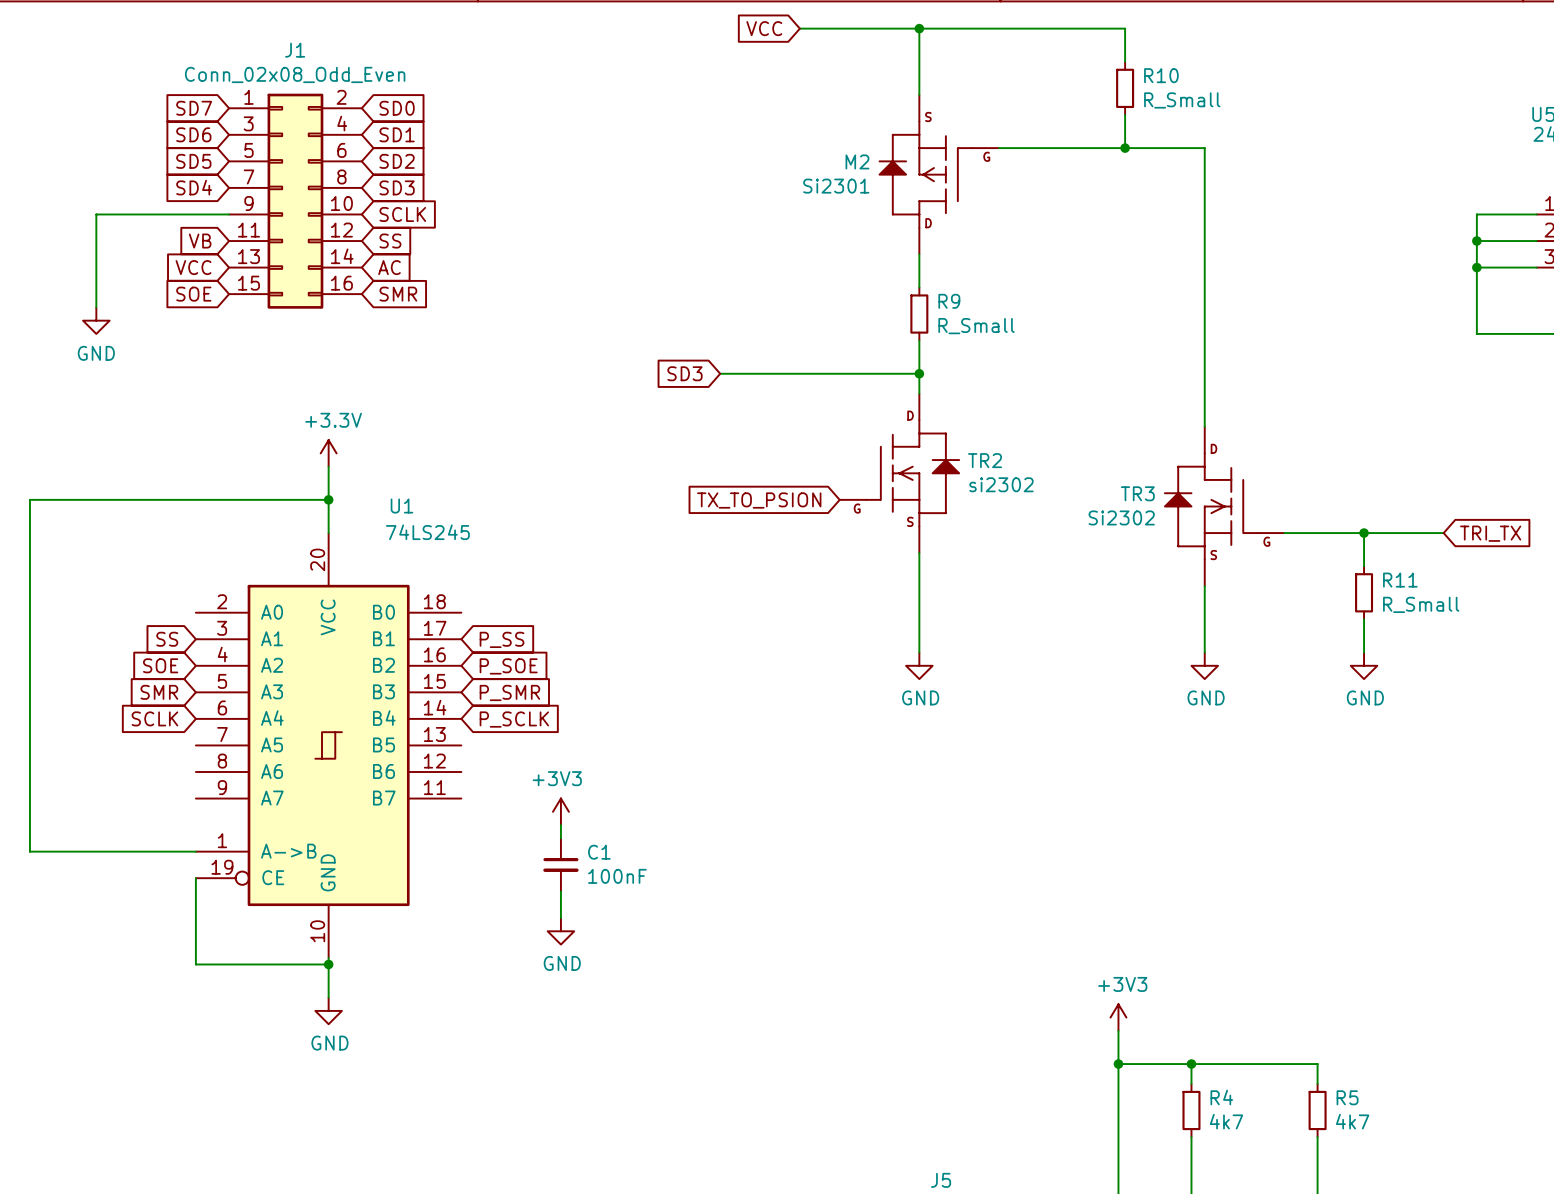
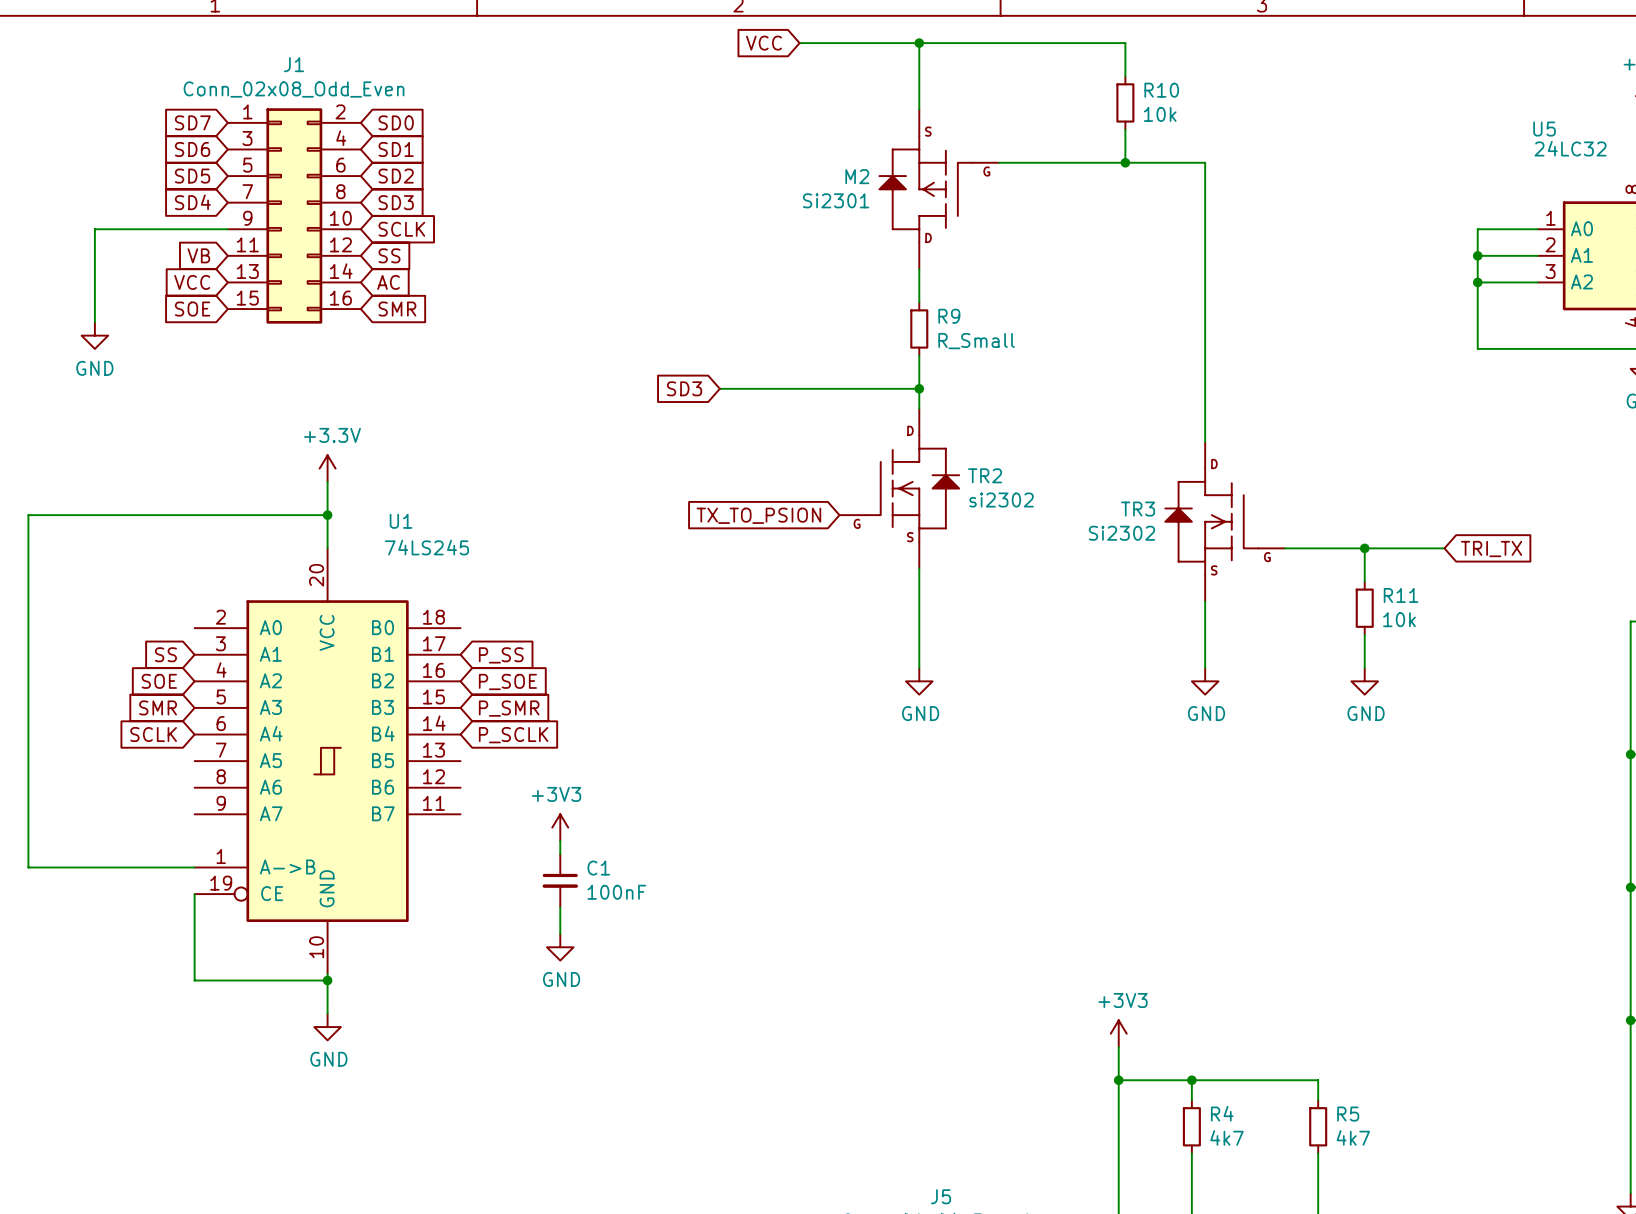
R10 value: R_Small (1182, 100) -> 10k (1160, 114)
R11 value: R_Small (1421, 604) -> 10k (1399, 619)

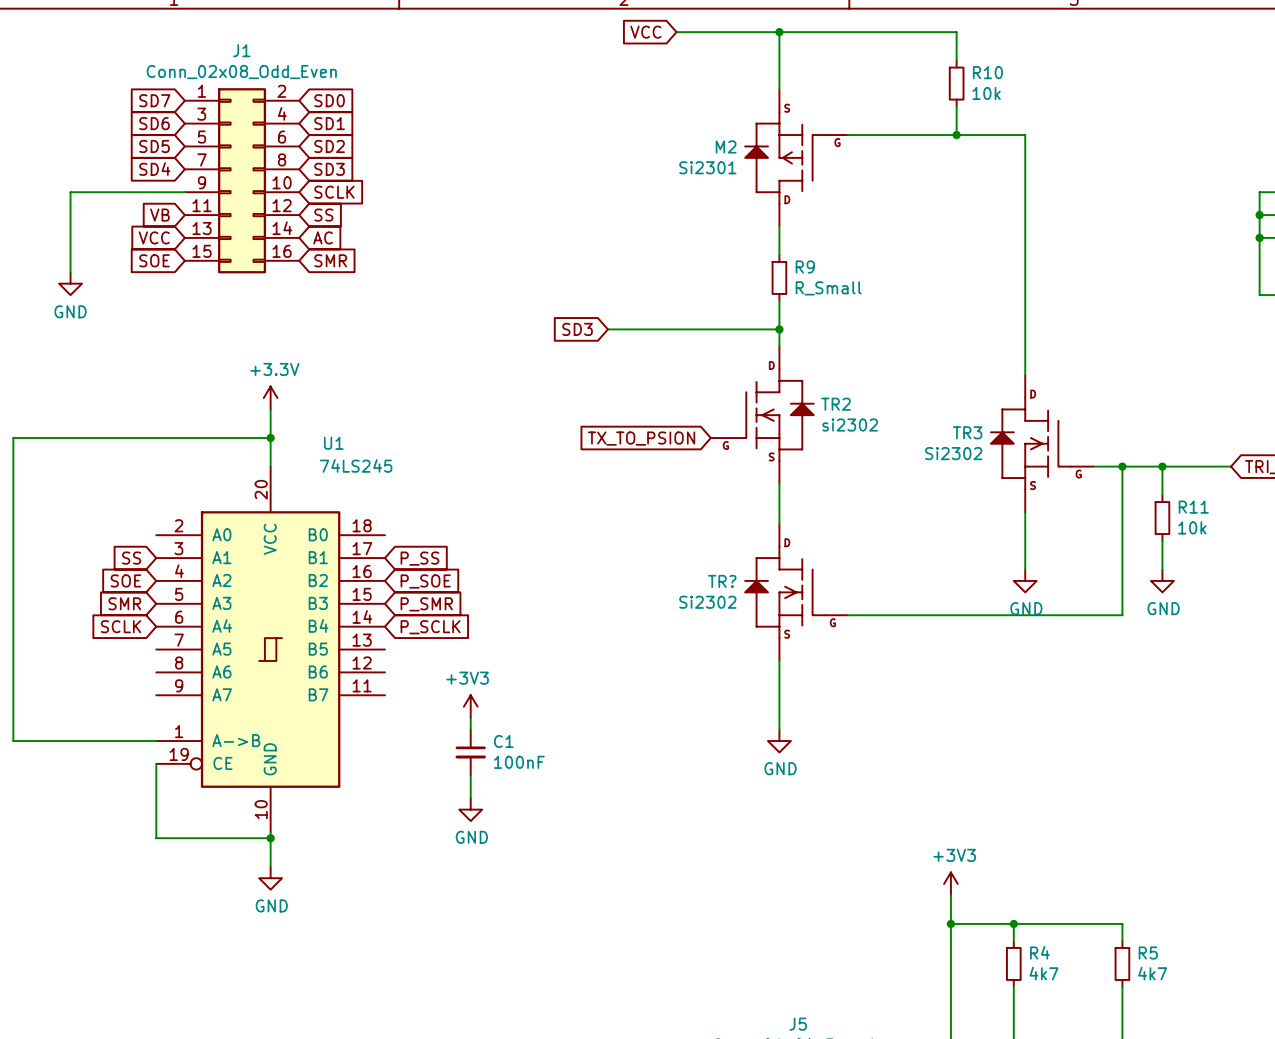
wire: none -> (1122, 466) (1122, 615) (848, 615)
junction: none -> (1122, 466)
power symbol position: GND (919, 681) -> GND (779, 741)
TR?: none -> Si2302 (796, 592)
wire: none -> (779, 660) (779, 729)

